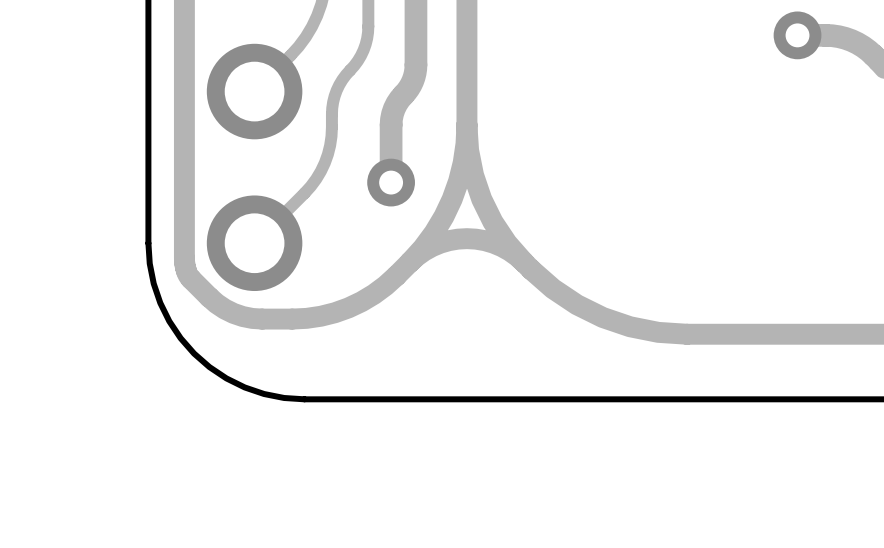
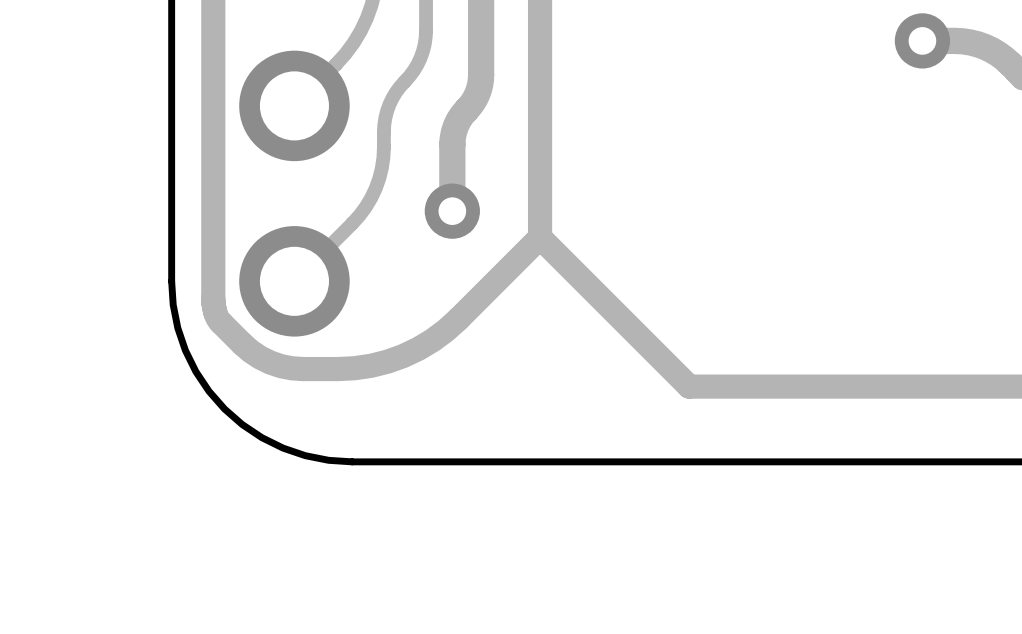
track: (466, 124) (468, 150) (473, 175) (481, 199) (492, 221) (507, 243) (523, 262) (509, 250) (493, 243) (466, 238) (440, 243) (424, 250) (410, 262) (434, 232) (452, 199) (463, 162) (466, 124) -> (540, 144) (540, 237)
track: none -> (540, 237) (605, 303)
track: none -> (540, 237) (474, 303)
track: (531, 269) (553, 288) (576, 304) (602, 317) (630, 326) (658, 332) (687, 334) -> (614, 312) (689, 386) (794, 386)

